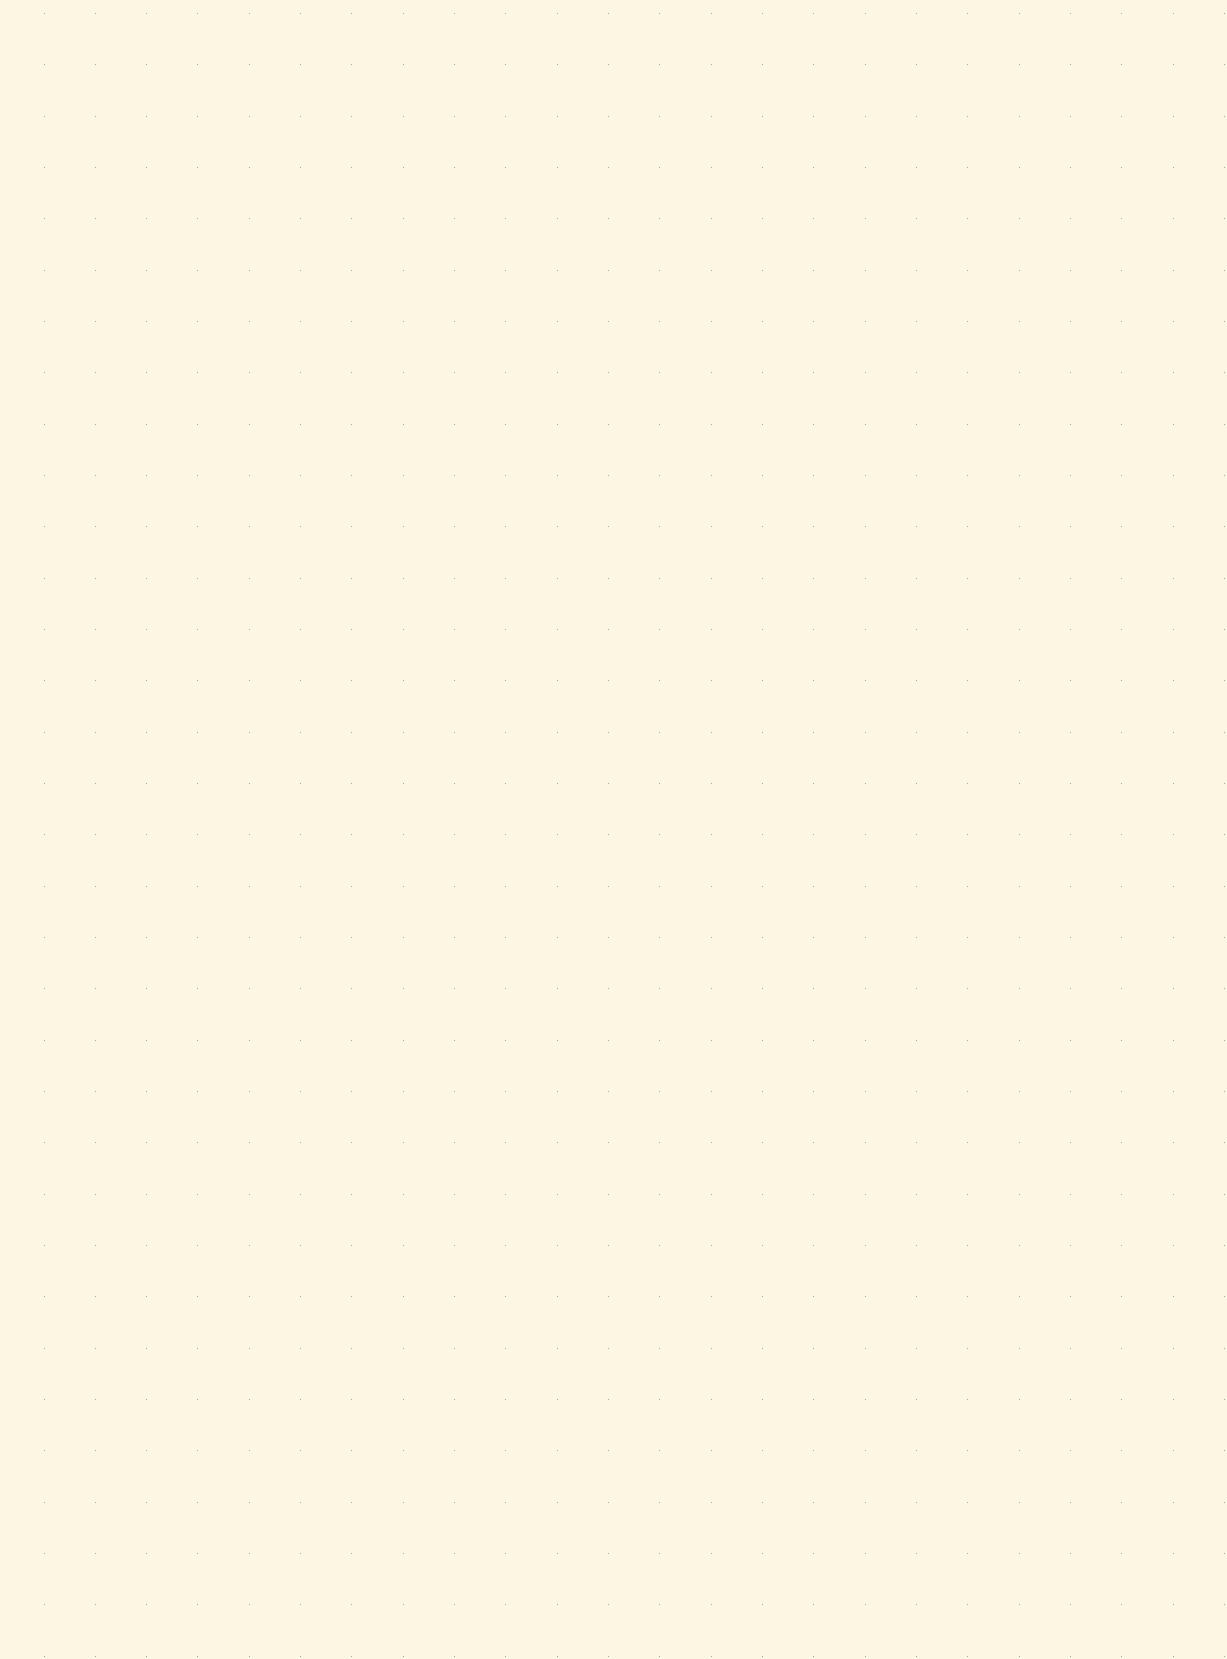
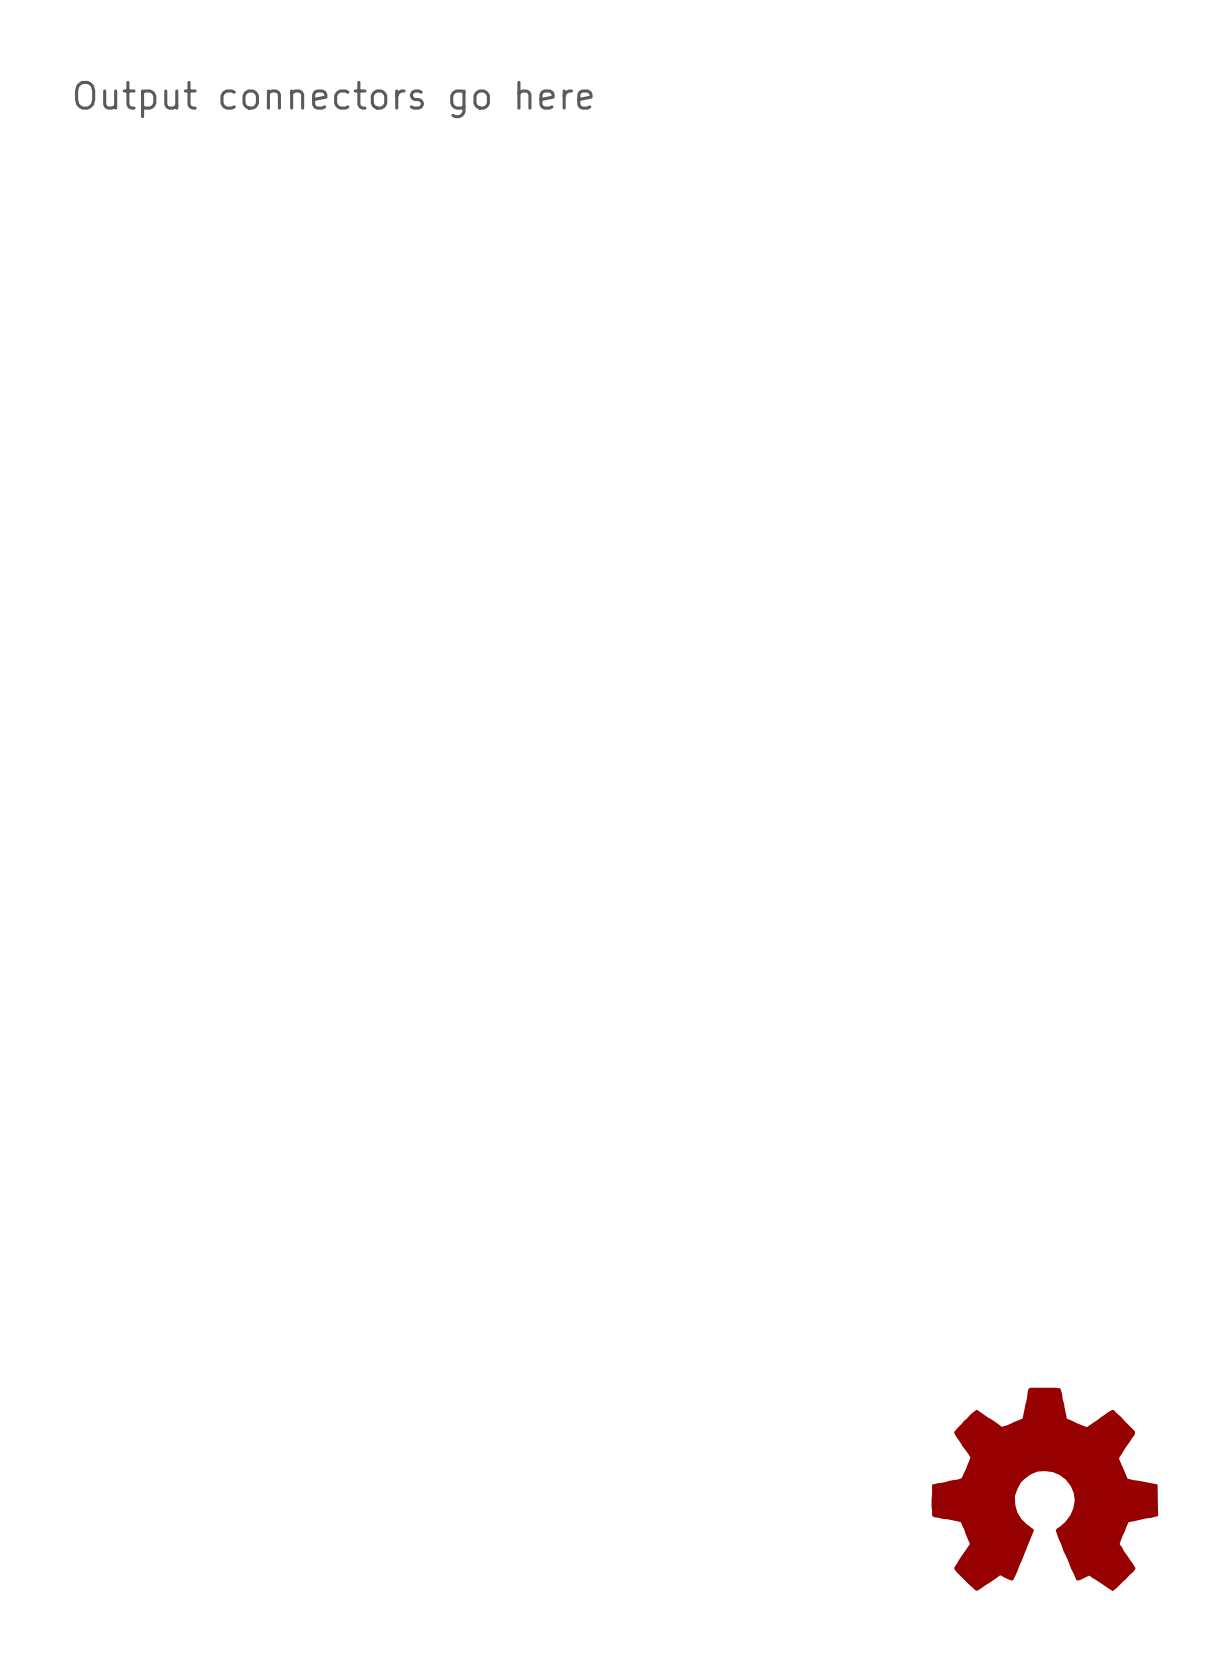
text: none -> Output connectors go here (333, 99)
part: none -> (1044, 1489)

